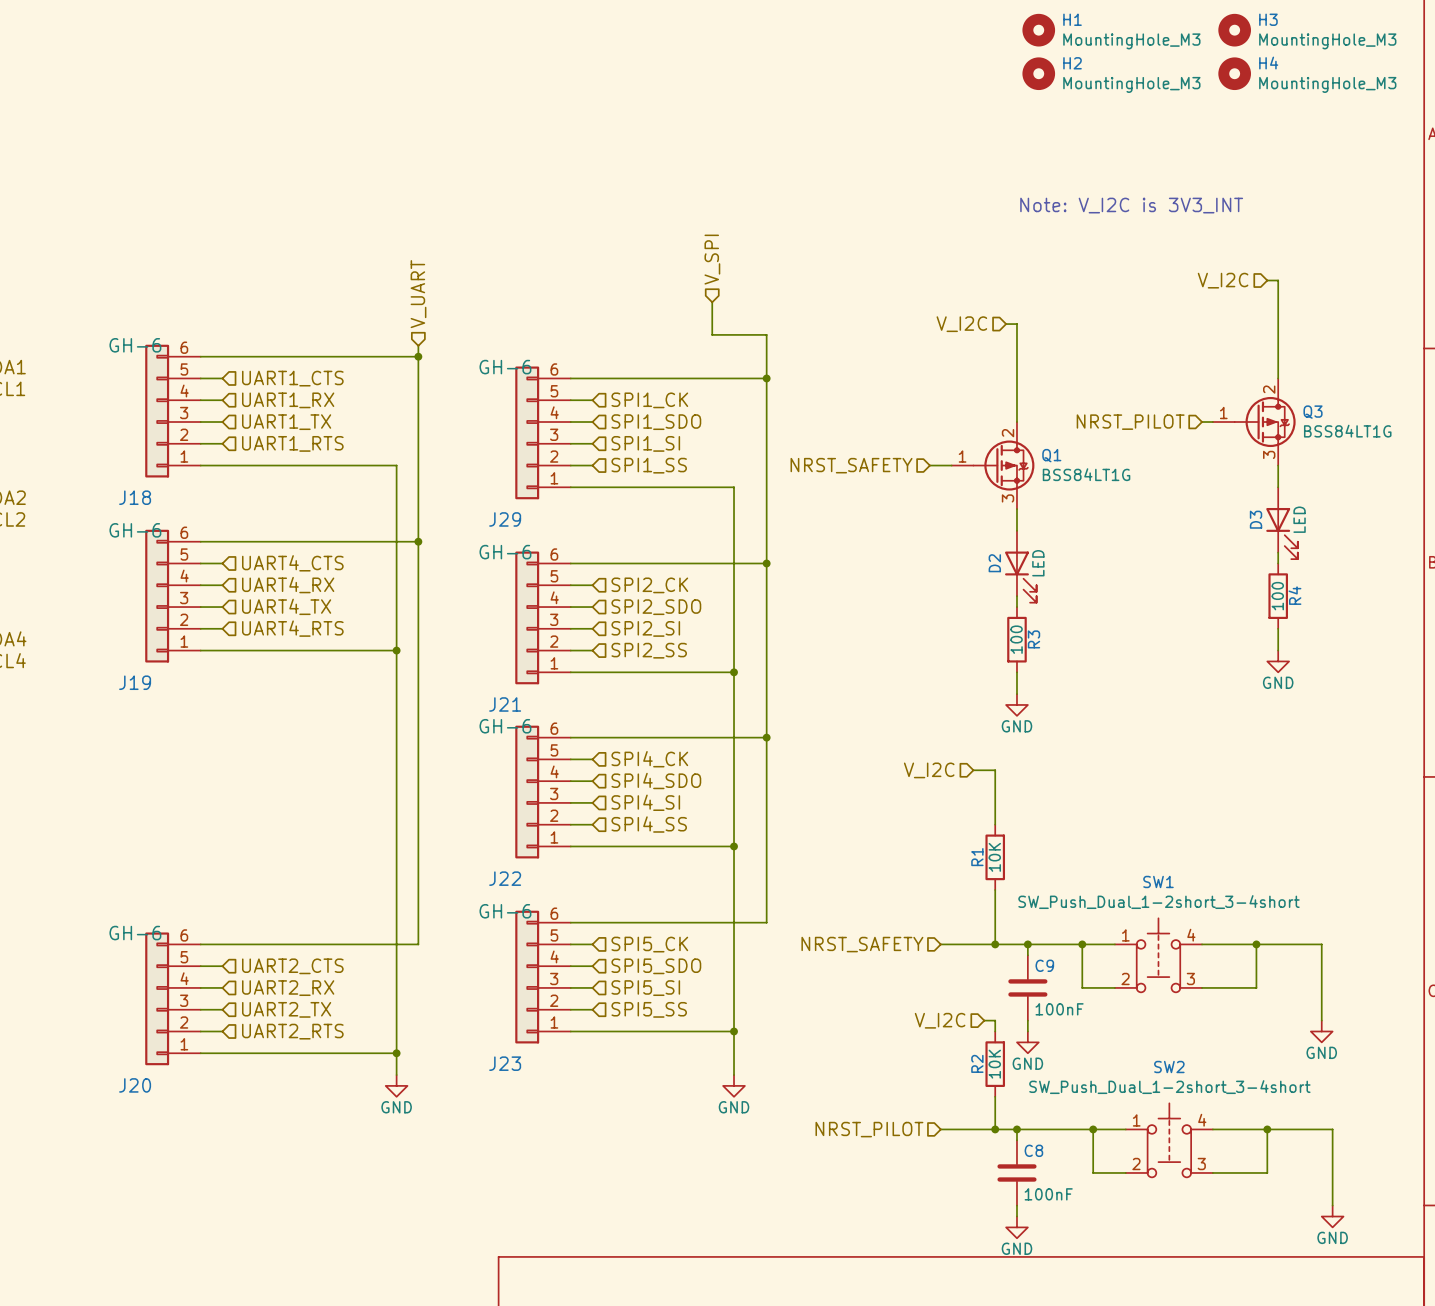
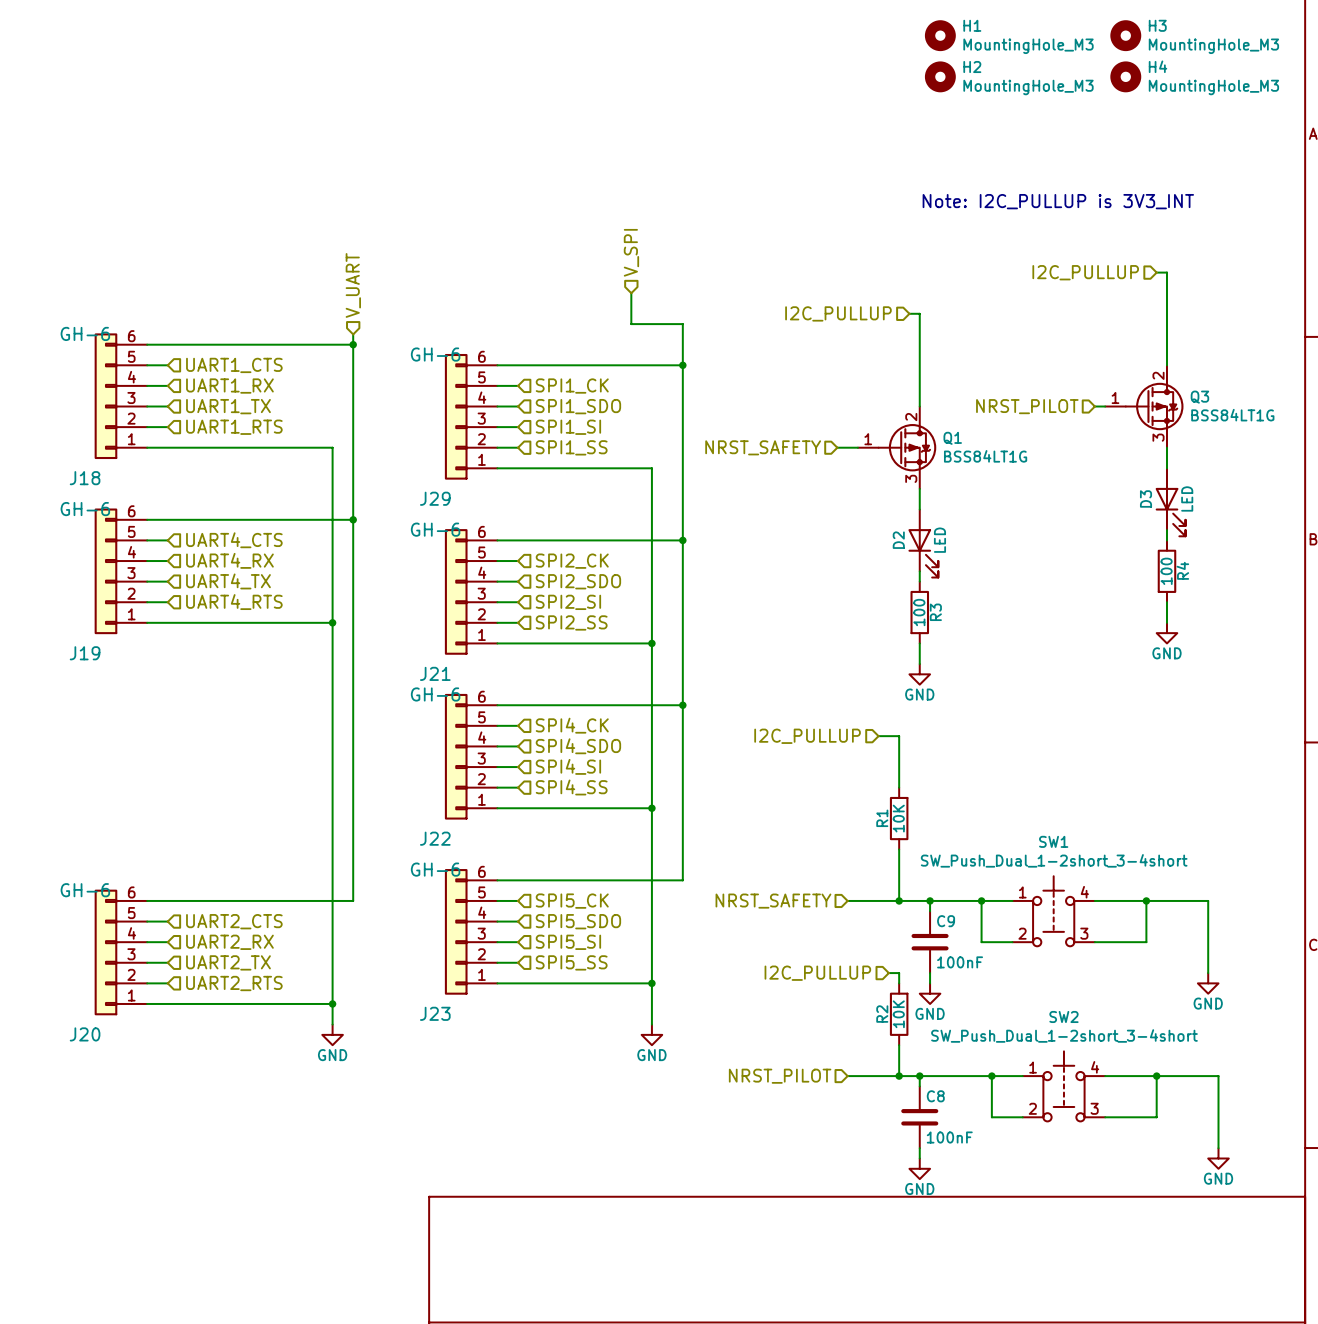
text: Note: V_I2C is 3V3_INT (1131, 205) -> Note: I2C_PULLUP is 3V3_INT (1058, 201)
hierarchical label: V_I2C (1223, 280) -> I2C_PULLUP (1085, 272)
hierarchical label: V_I2C (961, 324) -> I2C_PULLUP (838, 313)
hierarchical label: V_I2C (929, 770) -> I2C_PULLUP (807, 736)
hierarchical label: V_I2C (940, 1020) -> I2C_PULLUP (817, 973)

